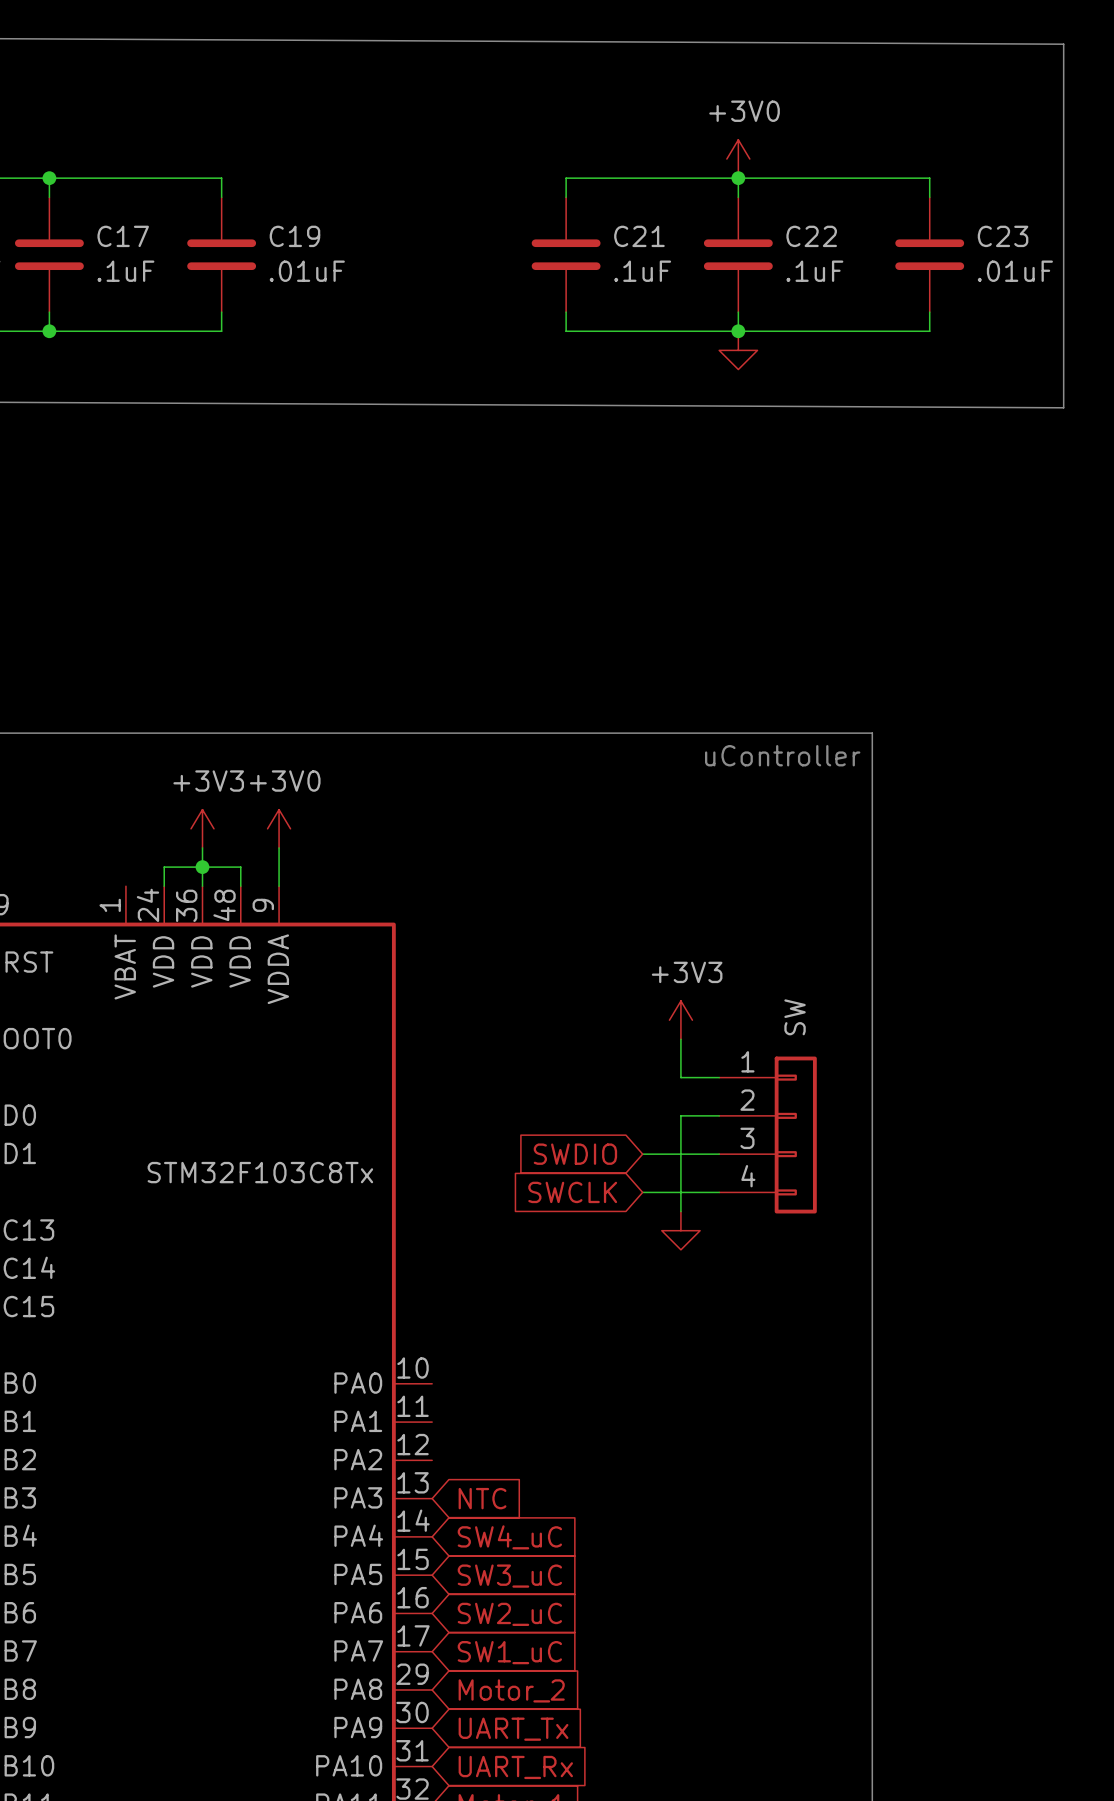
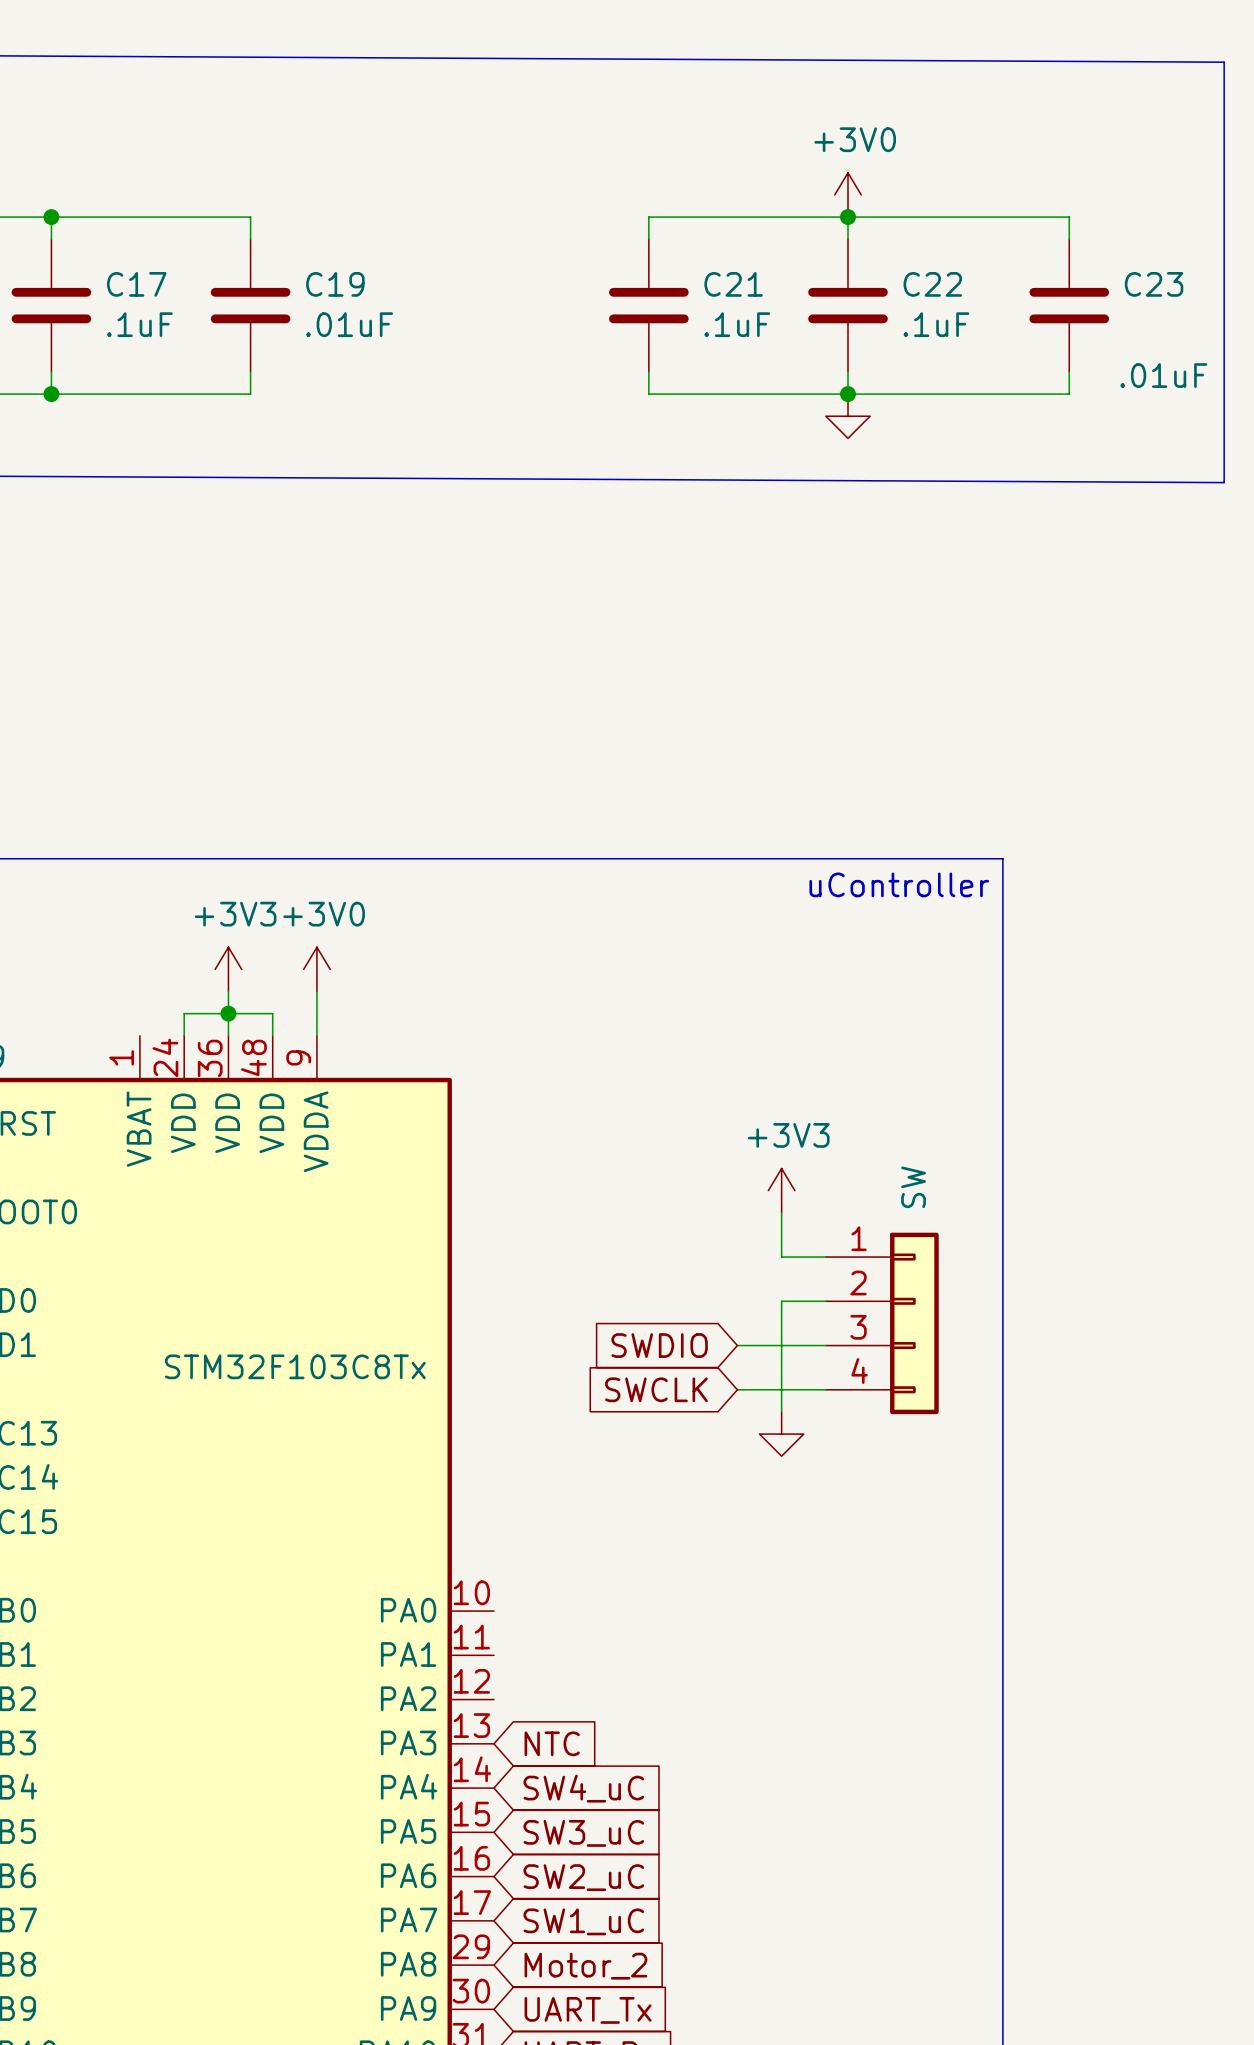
C23 value position: .01uF (1015, 271) -> .01uF (1163, 375)

